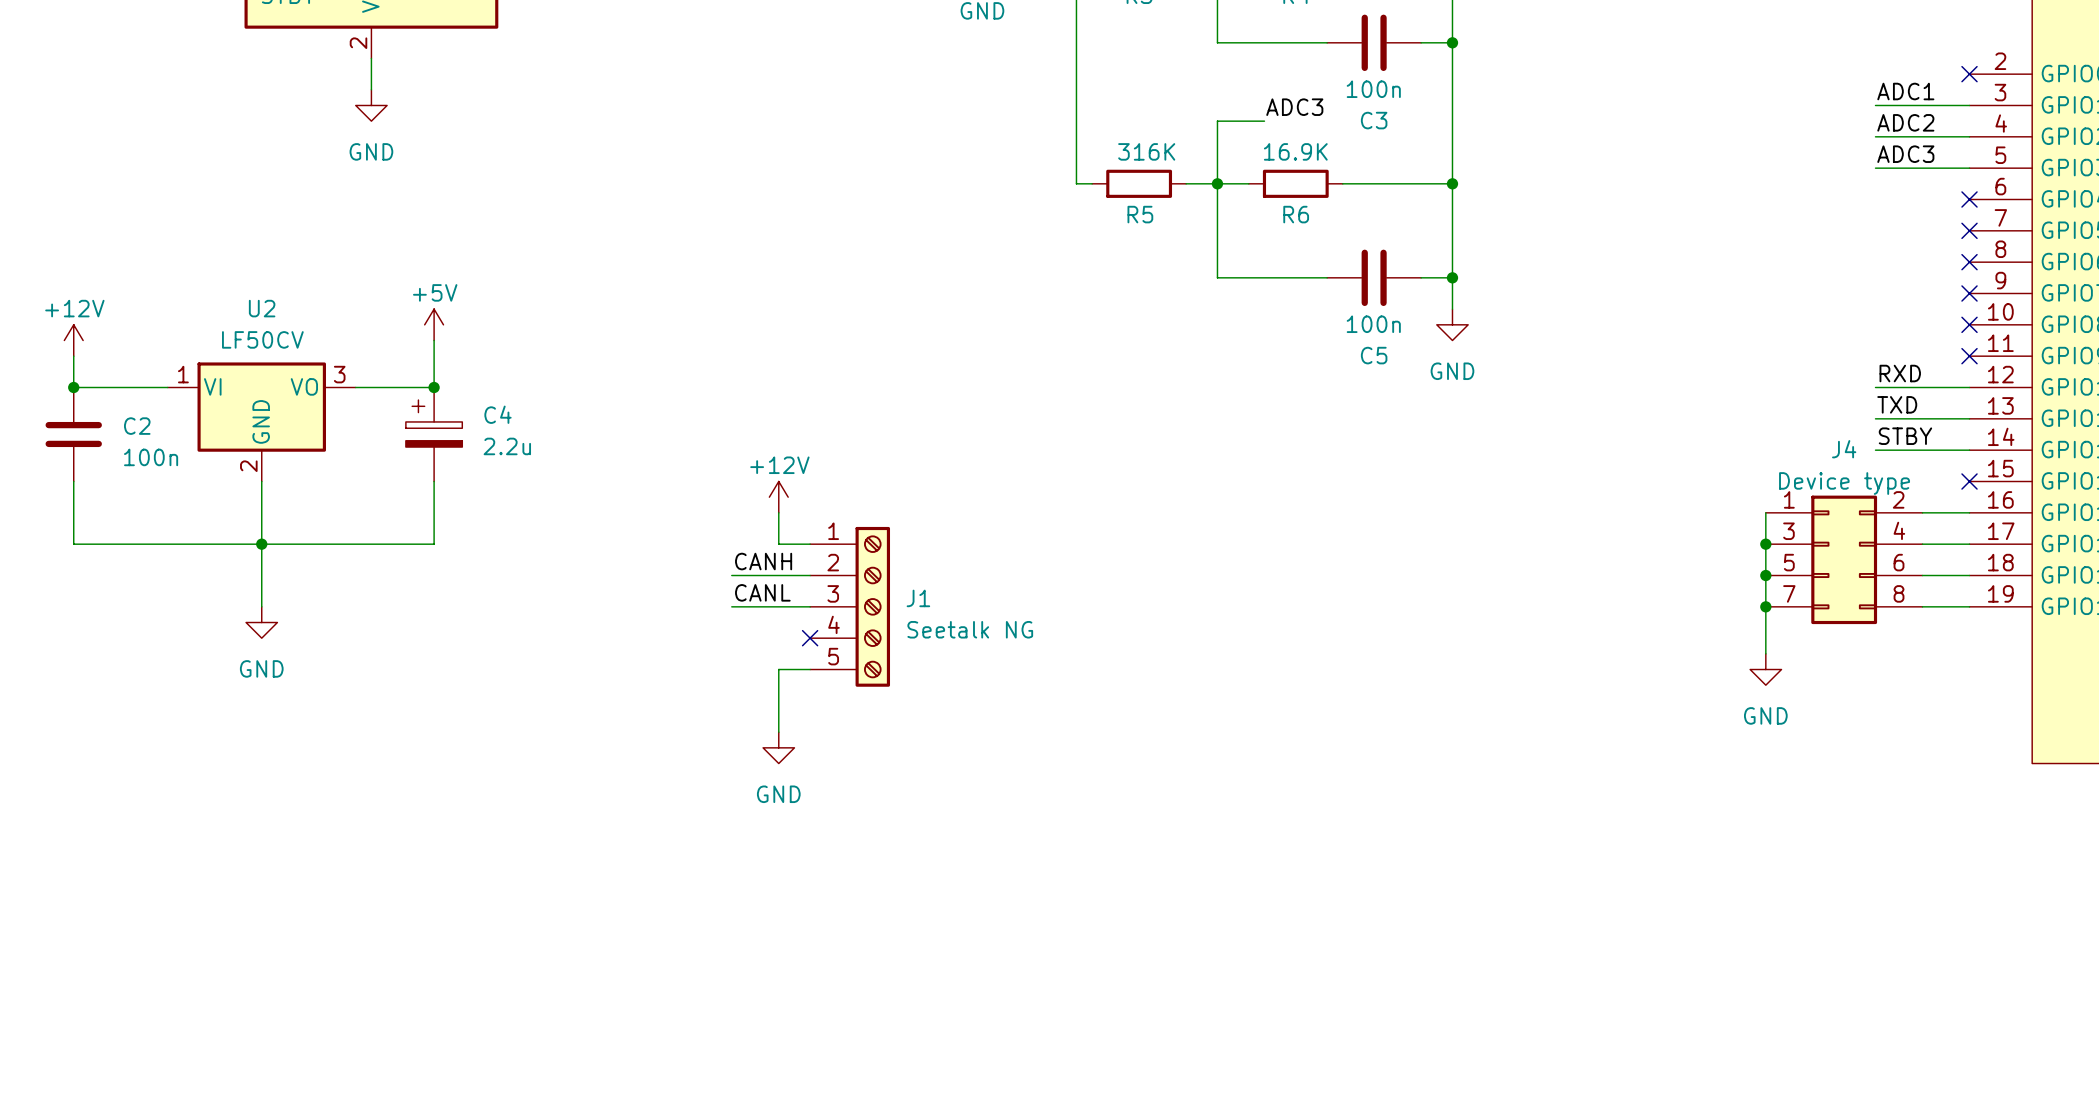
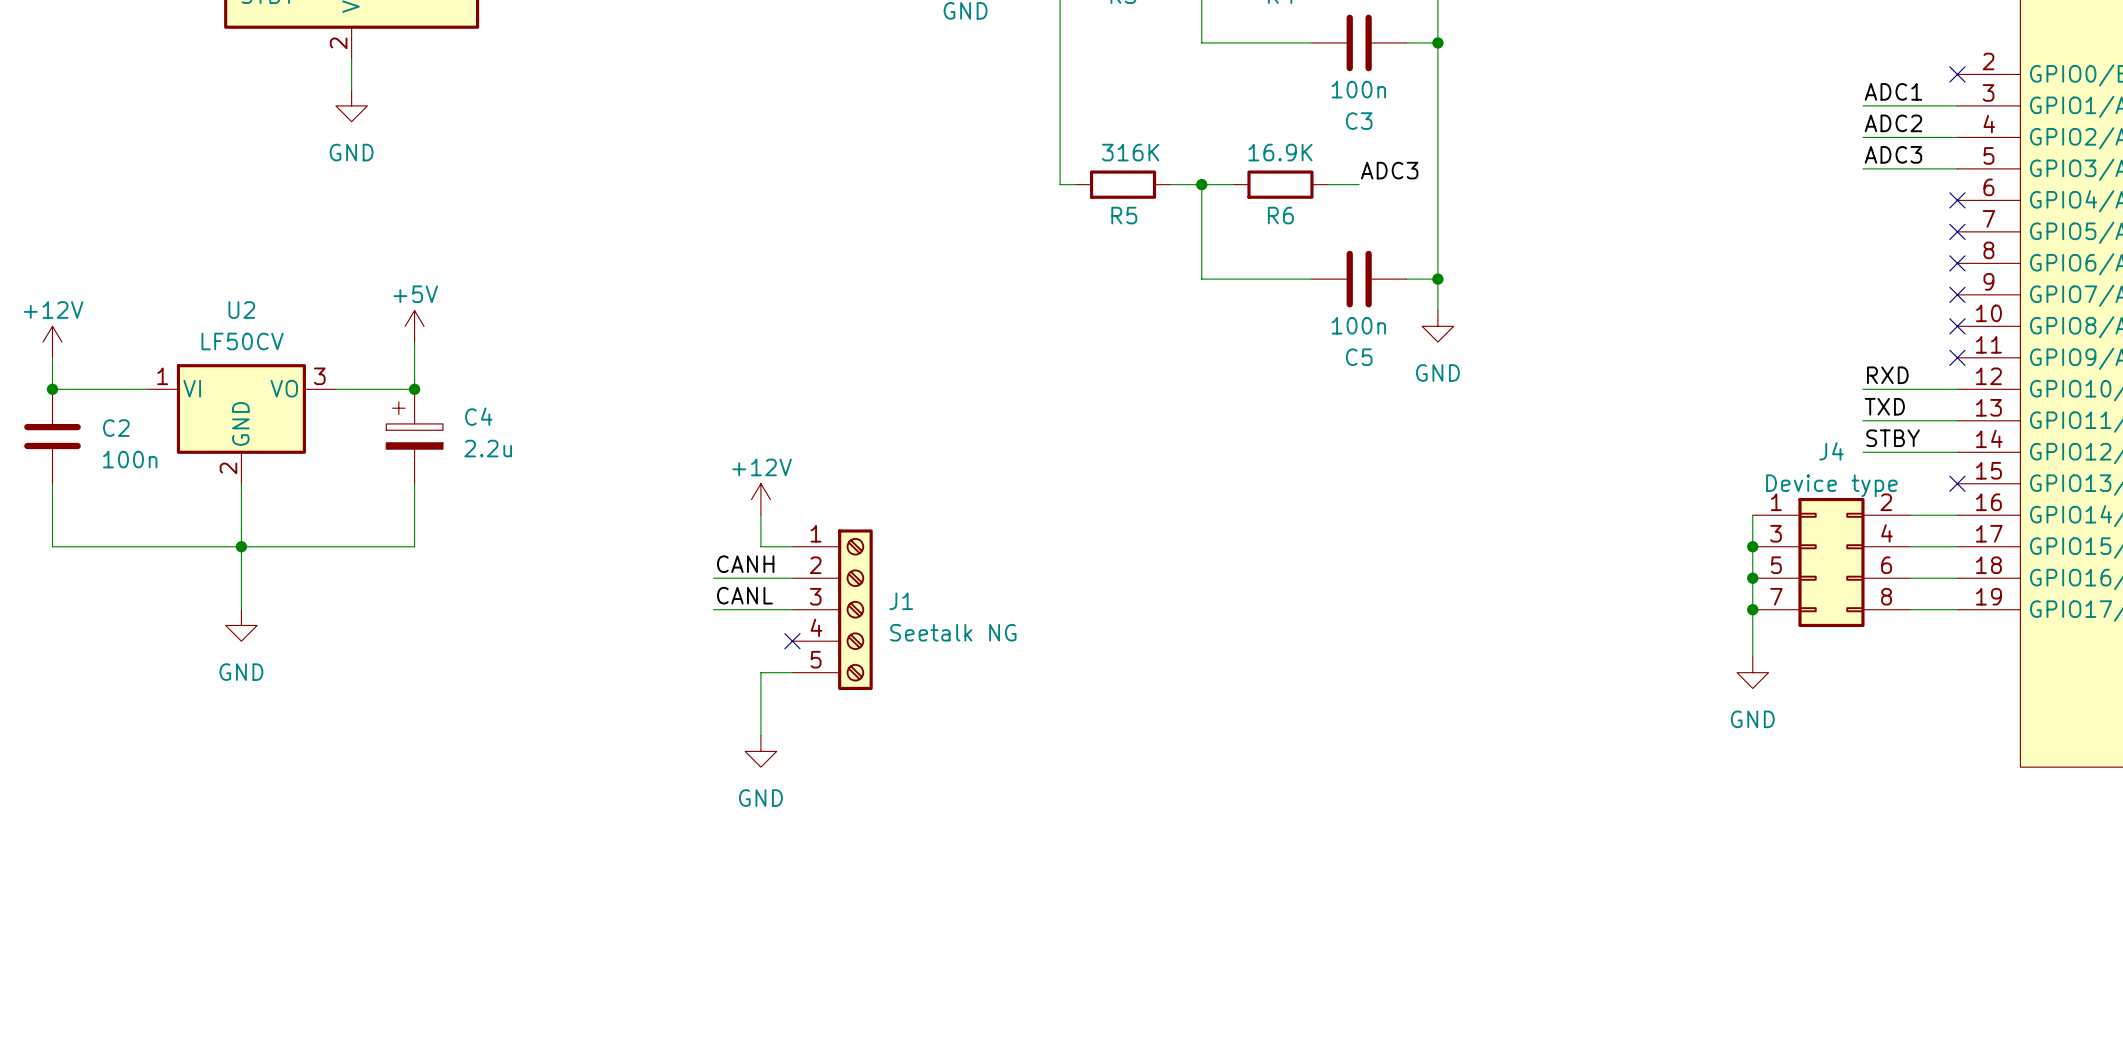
label position: ADC3 (1294, 107) -> ADC3 (1389, 170)
wire: (1264, 121) (1217, 121) (1217, 183) -> none
wire: (1374, 183) (1452, 183) -> none
junction: (1452, 183) -> none

